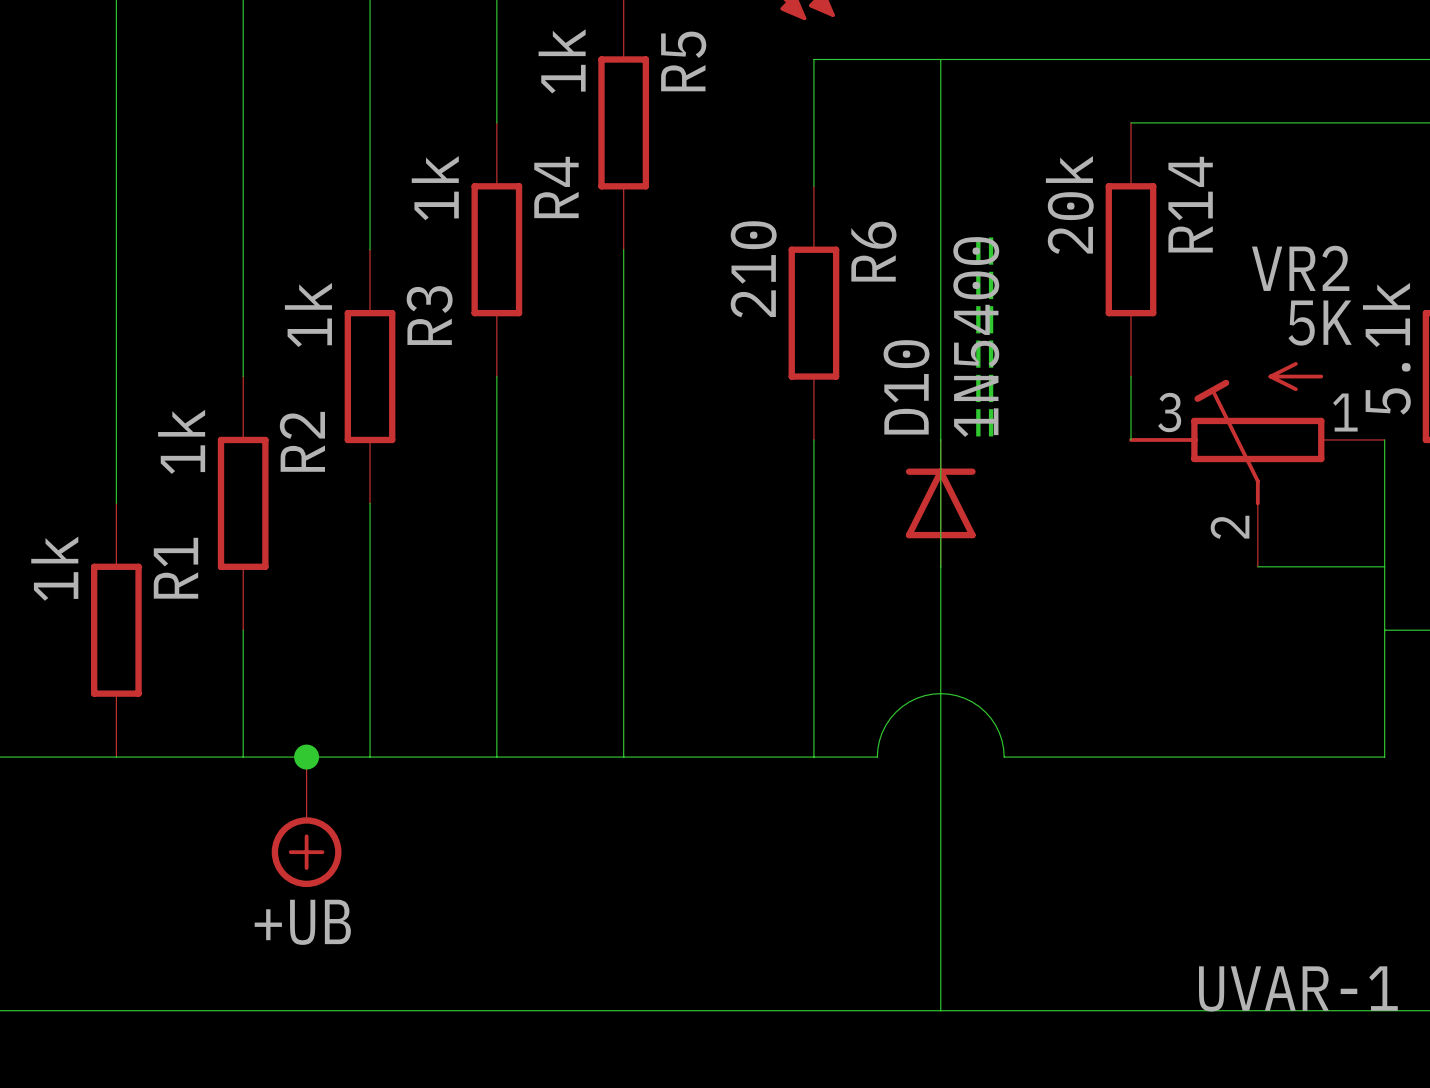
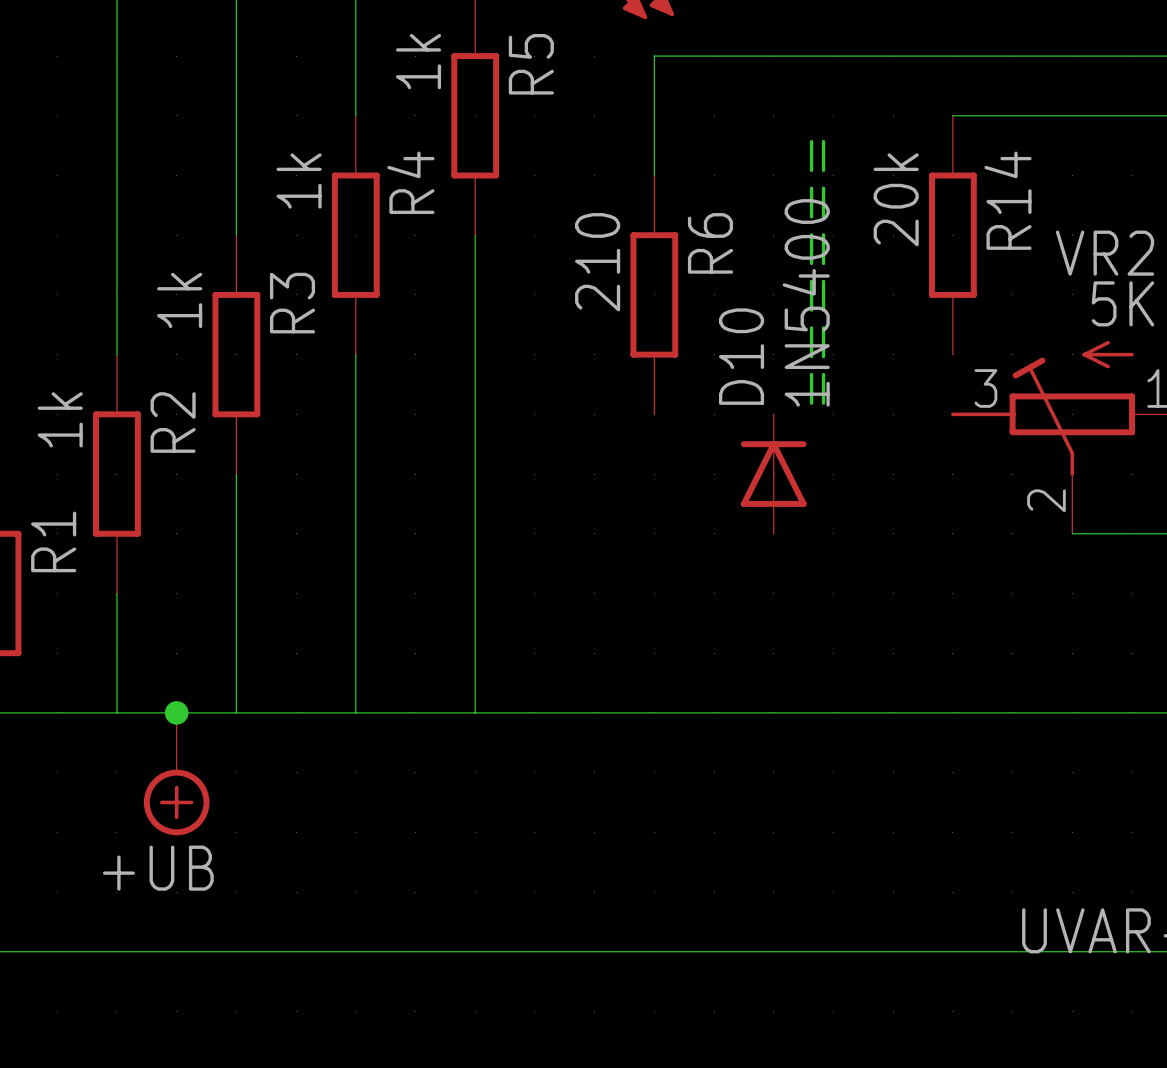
wire: (940, 59) (940, 1010) -> none
wire: (1131, 376) (1131, 439) -> none
wire: (813, 439) (813, 757) -> none
wire: (877, 757) (882, 732) (895, 712) (916, 698) (940, 693) (965, 698) (985, 712) (999, 732) (1004, 757) -> (714, 712) (833, 712)

